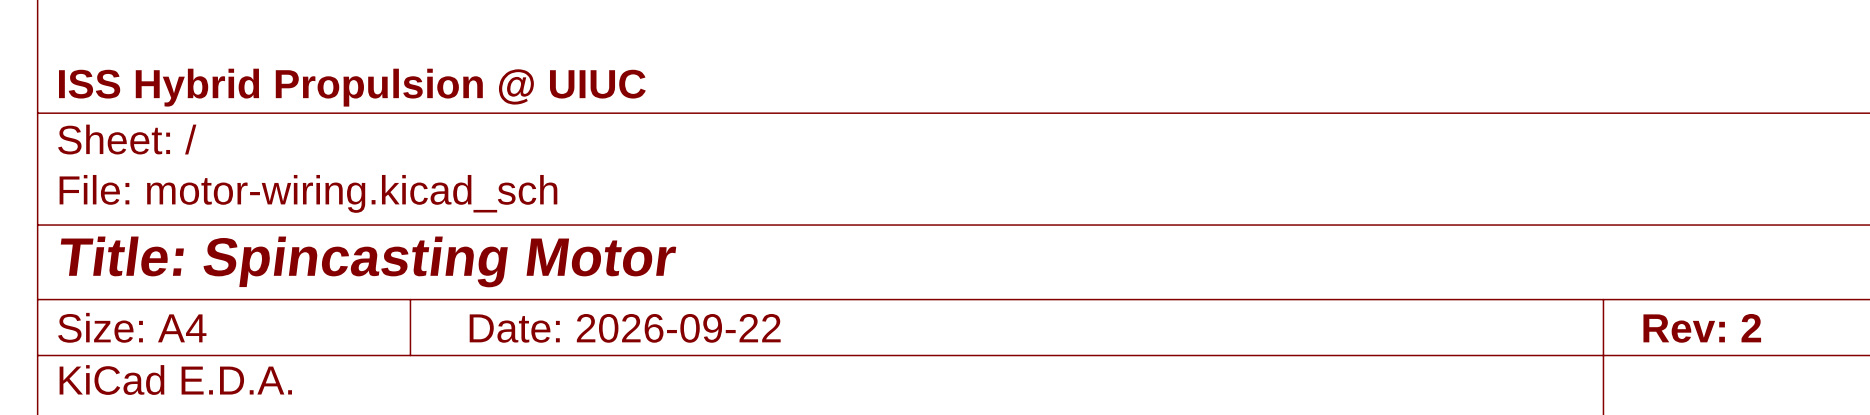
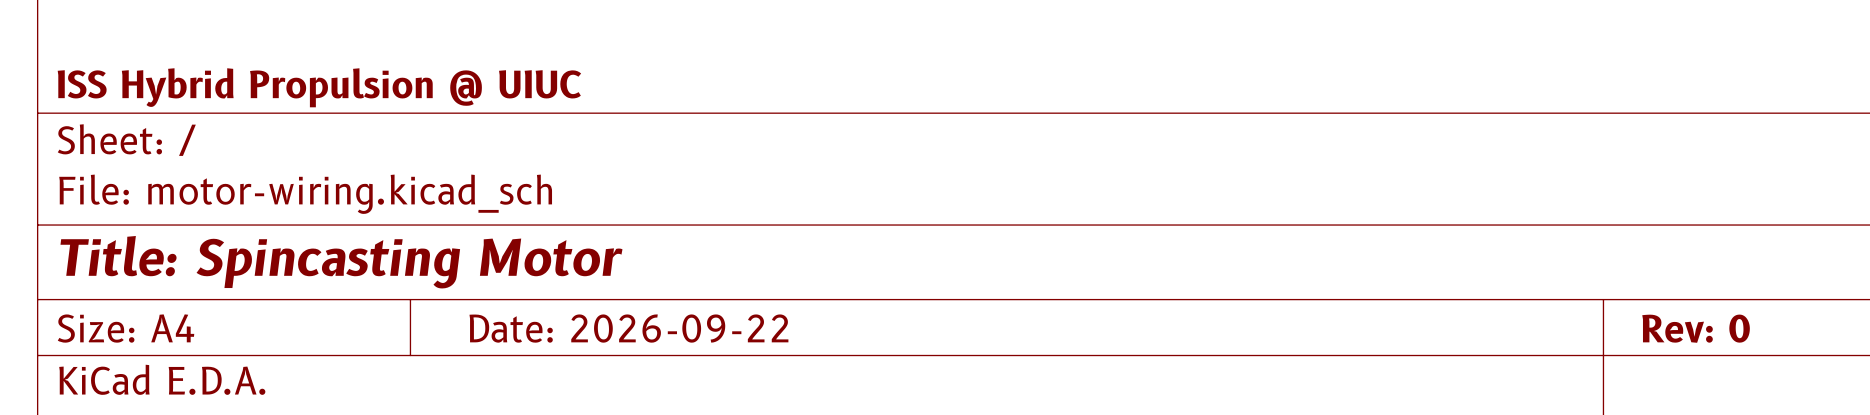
title block: Rev: 2 (1702, 328) -> Rev: 0 (1696, 328)

